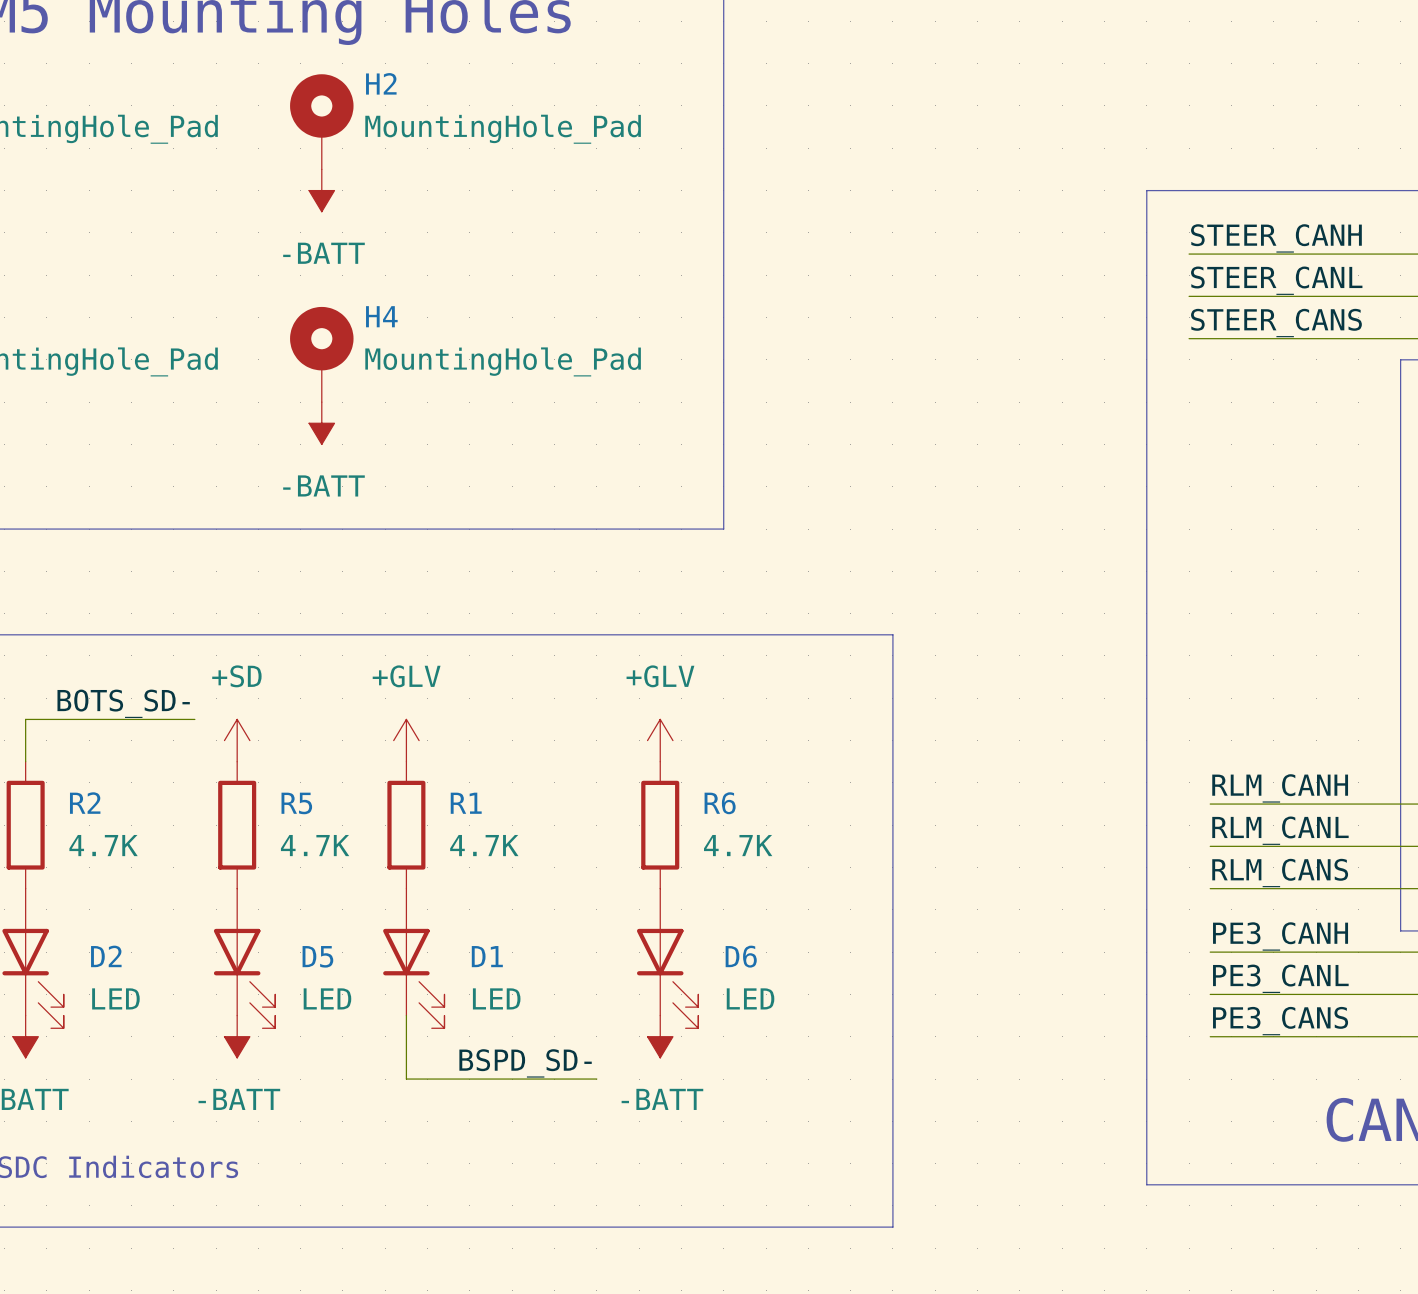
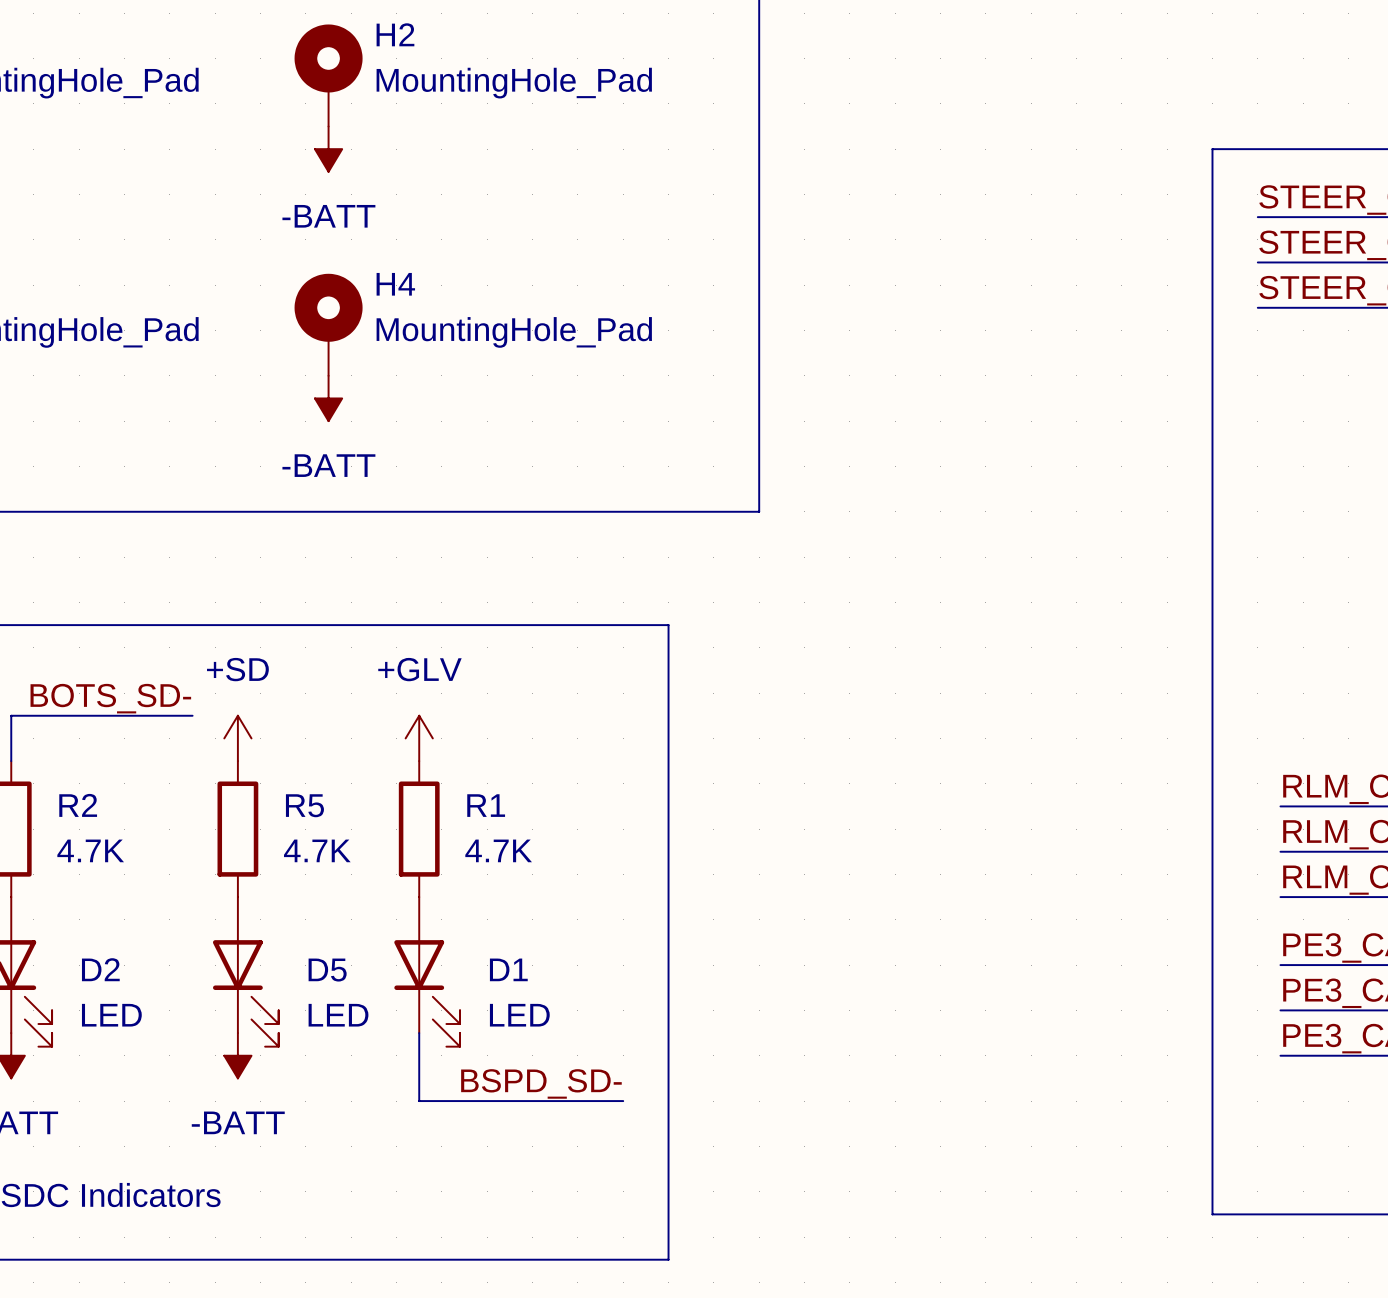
line: (639, 634) (892, 634) (892, 1227) (639, 1227) -> (668, 625) (668, 1259)
power symbol: +GLV (660, 740) -> none
R6: 4.7K (660, 825) -> none
D6: LED (667, 958) -> none
power symbol: -BATT (660, 1036) -> none

